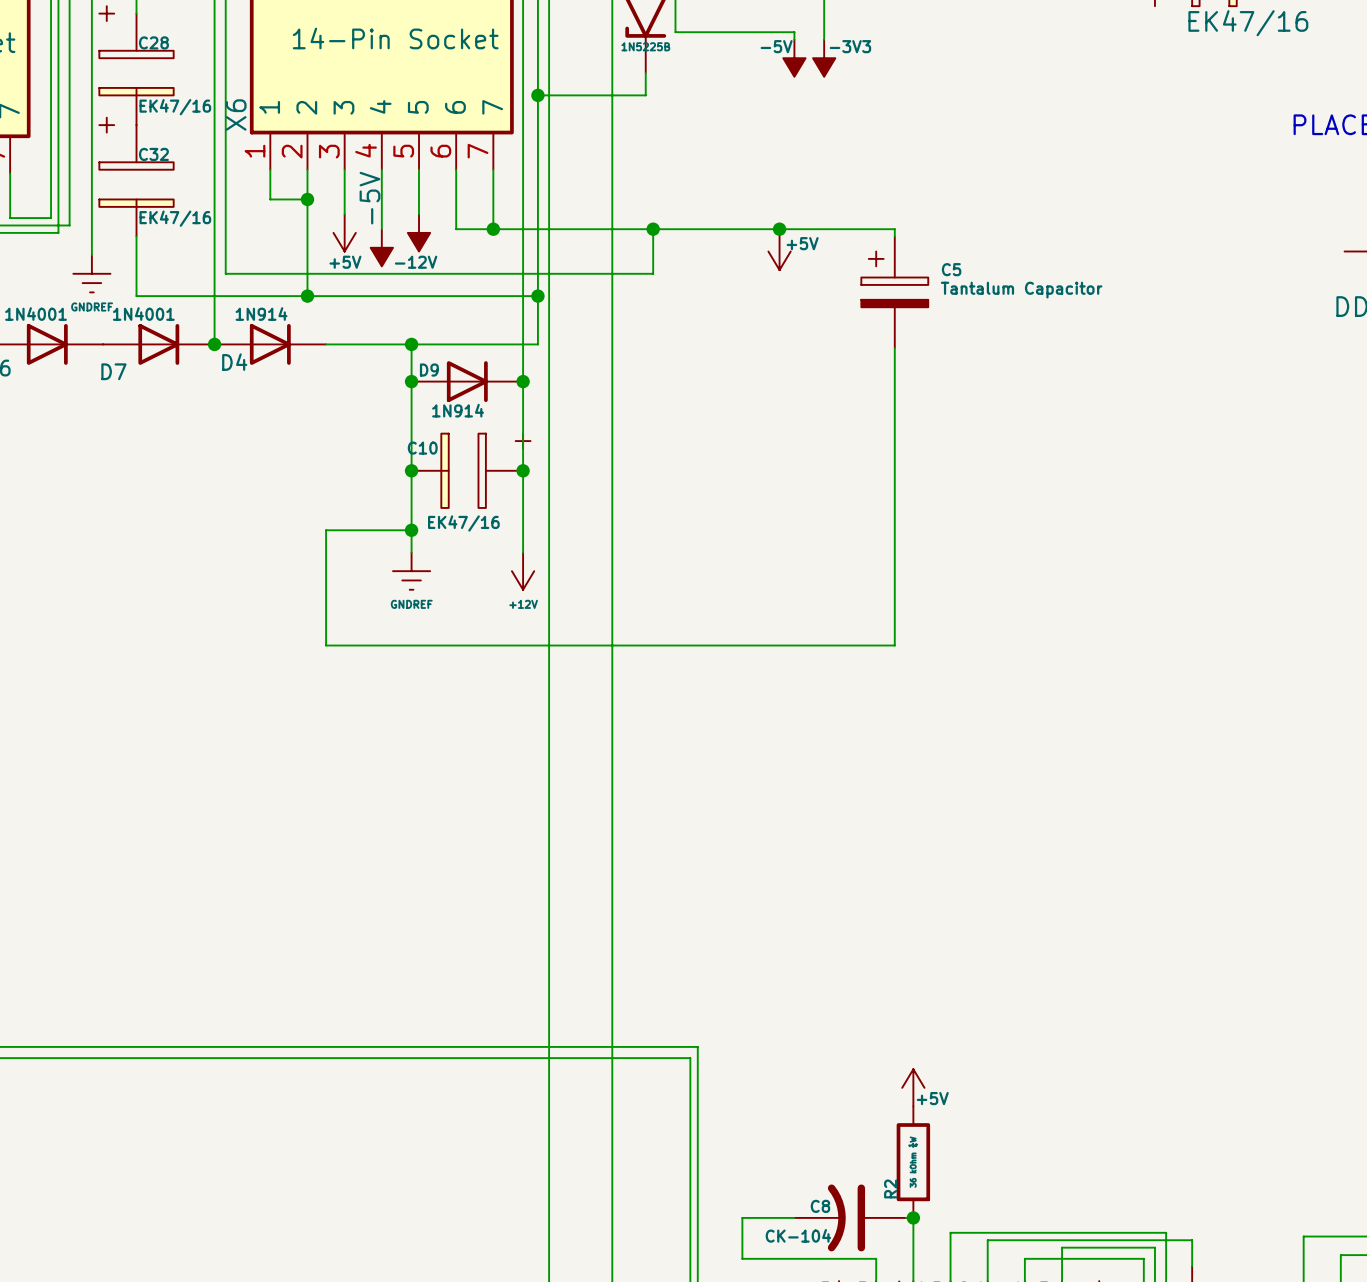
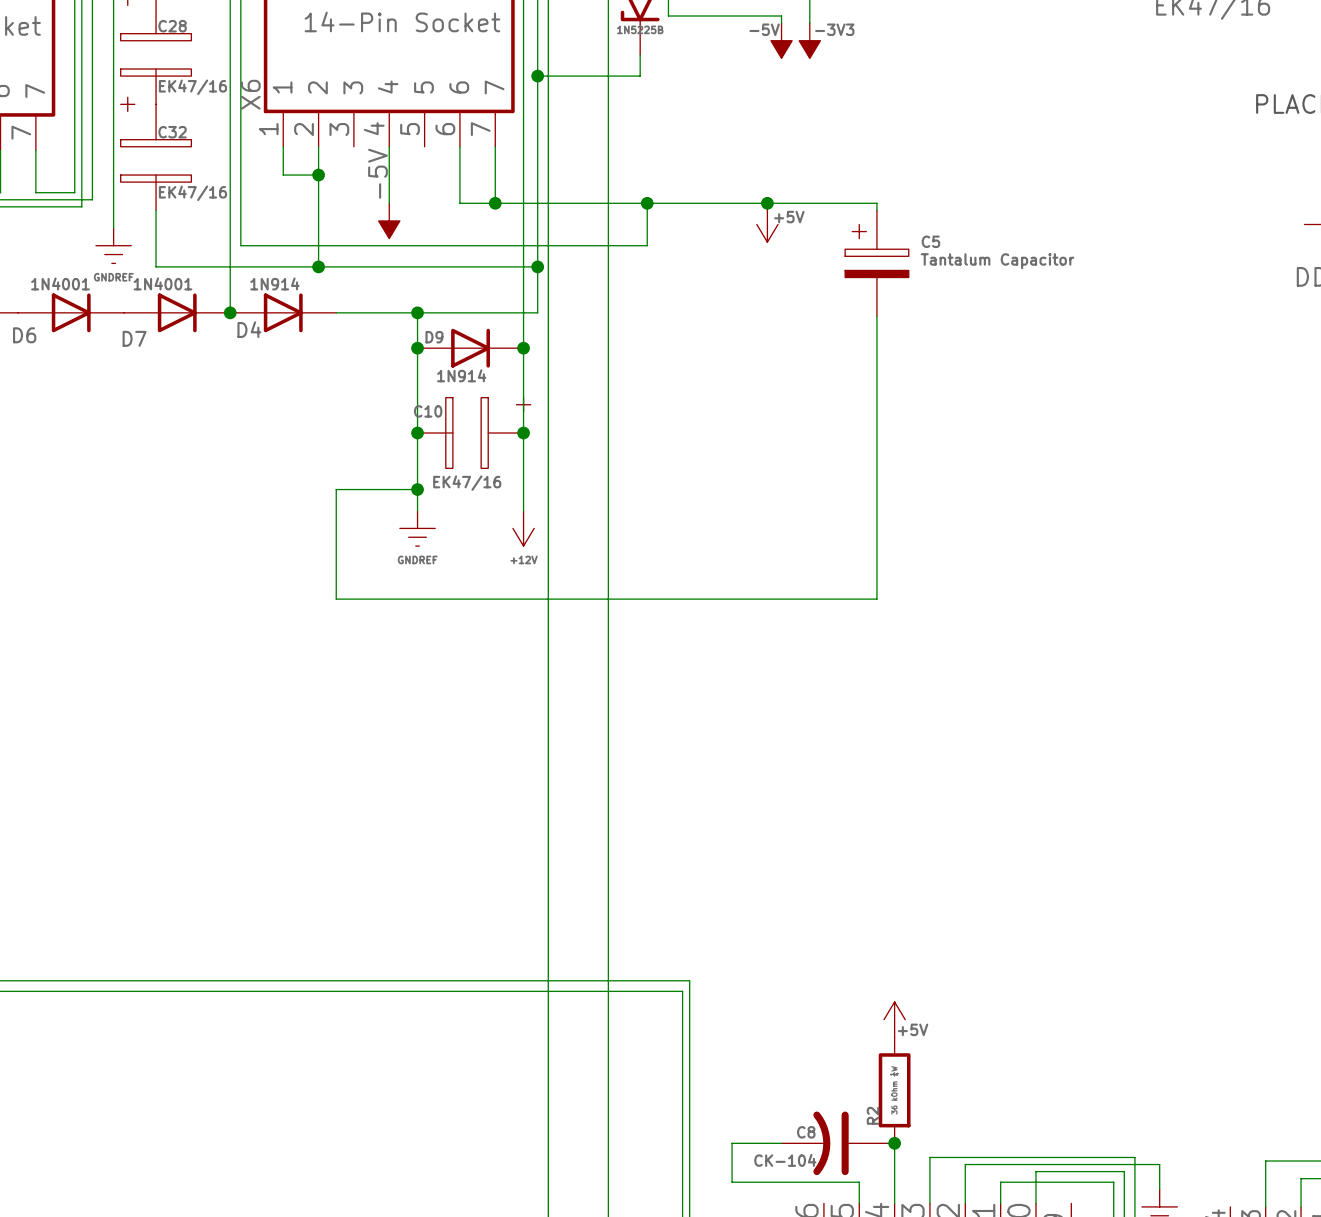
wire: (344, 169) (344, 214) -> none
wire: (419, 169) (419, 214) -> none
power symbol: +5V (344, 232) -> none
power symbol: -12V (419, 232) -> none

